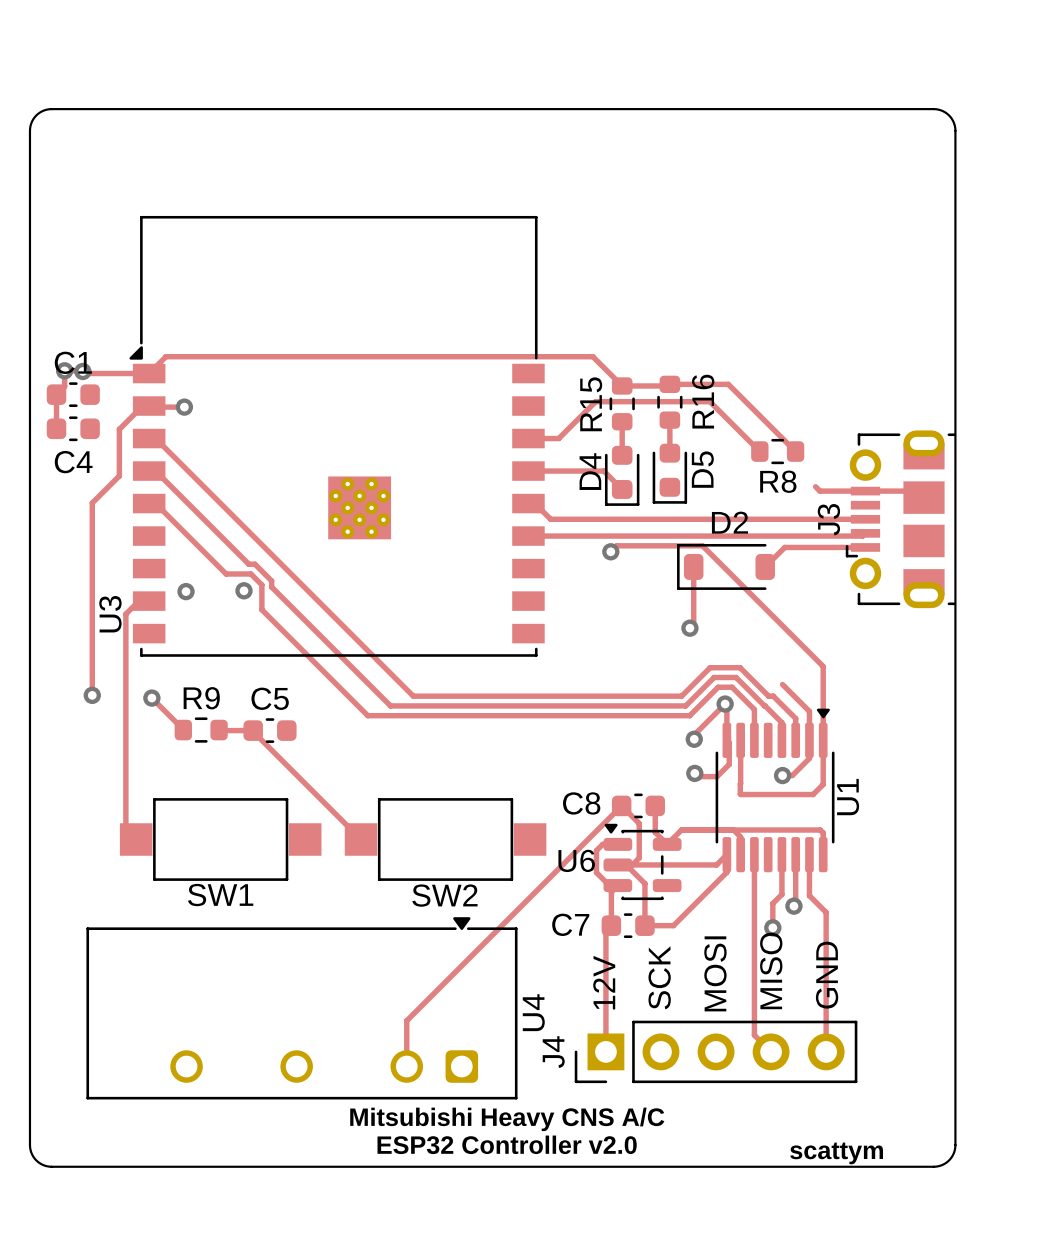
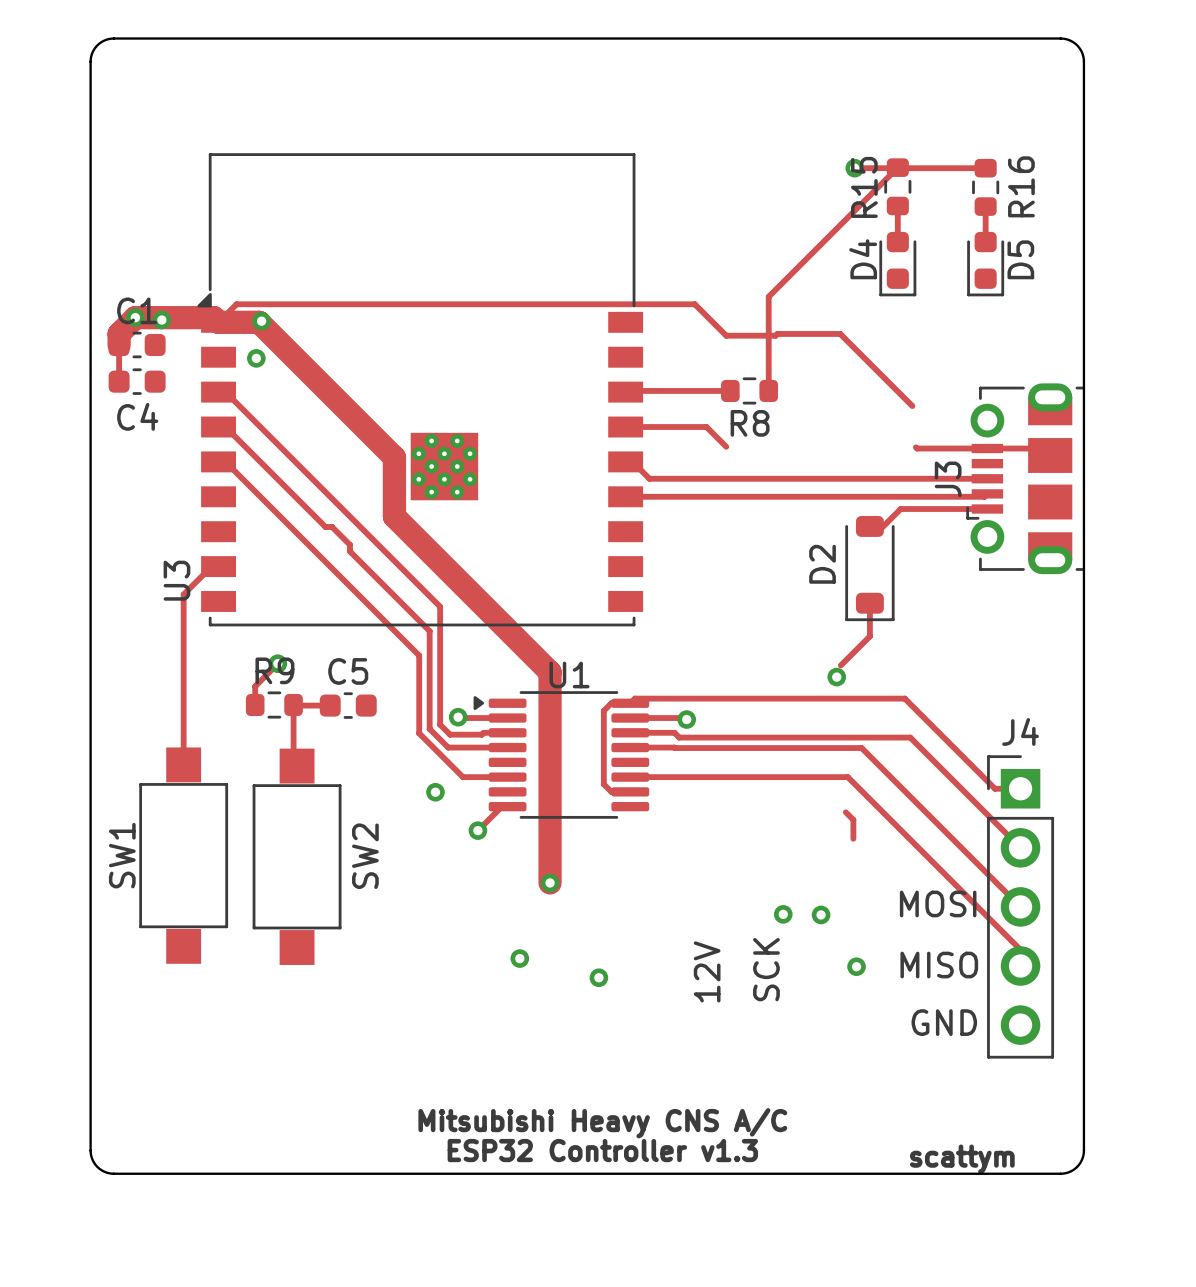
track: none -> (854, 168) (897, 168)
via: none -> (854, 168)
track: none -> (985, 168) (897, 167) (768, 296) (768, 390)
via: none -> (135, 317)
via: (64, 370) -> none
via: (82, 371) -> none
via: none -> (161, 320)
via: none -> (261, 321)
track: (149, 373) (84, 373) (82, 370) (64, 370) (64, 386) (56, 394) -> (550, 882) (550, 672) (394, 516) (394, 457) (259, 322) (218, 322) (213, 317) (135, 317) (119, 333) (119, 345)
R16 position: (669, 402) -> (985, 187)
R15 position: (622, 403) -> (897, 186)
track: (184, 407) (142, 406) (119, 429) (119, 475) (92, 503) (92, 695) -> none
track: (669, 420) (669, 453) -> (985, 206) (985, 242)
track: (622, 421) (622, 455) -> (897, 206) (897, 242)
track: (528, 438) (558, 438) (595, 401) (709, 401) (759, 451) -> (625, 392) (730, 390)
R8 position: (777, 451) -> (749, 390)
D5 position: (669, 473) -> (985, 264)
D4 position: (622, 475) -> (897, 264)
track: (815, 486) (819, 491) -> (915, 447) (938, 448)
track: (610, 551) (616, 545) (702, 545) (823, 666) (823, 784) (813, 794) (740, 794) (740, 740) -> none
via: (610, 551) -> none
track: (693, 566) (693, 624) (689, 628) -> none
D2 rotation: 0° (726, 566) -> 90° counterclockwise (869, 568)
track: (226, 574) (250, 574) (261, 584) (261, 609) -> (301, 537) (339, 575)
via: (243, 590) -> none
via: (186, 591) -> none
track: (142, 601) (138, 601) (125, 614) (125, 829) (136, 839) -> (211, 566) (183, 594) (183, 764)
via: (689, 628) -> none
track: none -> (869, 603) (869, 636) (840, 665)
track: (355, 638) (413, 696) (681, 696) (710, 667) (740, 667) (768, 696) (773, 696) (795, 718) (795, 740) -> (440, 606) (440, 724) (450, 734) (507, 732)
track: (345, 661) (390, 705) (685, 705) (714, 677) (736, 677) (781, 722) (781, 740) -> (429, 631) (429, 729) (448, 747) (507, 747)
track: (336, 683) (367, 715) (689, 715) (718, 687) (732, 687) (754, 709) (754, 740) -> (419, 655) (419, 733) (462, 777) (507, 777)
track: (782, 684) (809, 711) (809, 758) (792, 775) (782, 775) (785, 778) -> none
via: none -> (277, 663)
via: (92, 695) -> none
track: (151, 698) (183, 729) -> (277, 663) (255, 686) (255, 704)
via: (151, 698) -> none
track: none -> (293, 705) (293, 762) (297, 766)
track: (253, 730) (361, 839) -> none
track: (693, 738) (694, 734) (725, 704) (726, 705) (729, 764) (717, 776) (698, 776) (694, 773) -> none
via: (694, 739) -> none
track: none -> (458, 717) (507, 718)
via: none -> (458, 717)
track: none -> (630, 718) (686, 719)
via: none -> (686, 719)
track: none -> (630, 732) (674, 732) (679, 737) (910, 737) (1020, 847)
track: none -> (630, 747) (861, 748) (1020, 906)
via: (694, 773) -> none
via: (782, 775) -> none
U1 rotation: 0° (775, 790) -> 90° counterclockwise (561, 754)
U1 position: (775, 790) -> (561, 754)
track: none -> (630, 777) (847, 777) (1020, 949) (1020, 966)
C8: (638, 805) -> none
track: (655, 805) (655, 832) (667, 844) (681, 830) (820, 830) (823, 832) (823, 854) -> none
track: none -> (1020, 788) (994, 788) (904, 698) (634, 698) (630, 703) (611, 703) (603, 710) (603, 784) (611, 791) (630, 791)
via: none -> (435, 792)
track: none -> (507, 806) (501, 806) (477, 830)
SW1 rotation: 0° (220, 839) -> 90° clockwise (183, 855)
SW2 rotation: 0° (445, 839) -> 90° clockwise (297, 856)
SW2 position: (445, 839) -> (297, 856)
track: (617, 844) (602, 844) (596, 850) (596, 872) (609, 885) (617, 885) (611, 892) (611, 925) (605, 931) (605, 1051) -> none
via: none -> (477, 830)
track: (754, 854) (754, 1035) (771, 1051) -> none
track: (781, 854) (781, 894) (772, 903) (772, 927) -> none
track: (795, 854) (795, 904) (793, 906) -> none
track: (809, 854) (809, 895) (826, 912) (826, 1051) -> none
U6: (642, 861) -> none
track: (617, 864) (716, 864) (726, 854) (726, 872) (673, 925) (644, 925) (644, 883) (626, 864) -> none
track: (632, 864) (639, 857) (639, 823) (621, 805) (406, 1020) (406, 1066) -> none
SW2 name position: SW2 (444, 895) -> SW2 (365, 856)
via: none -> (550, 882)
via: (793, 906) -> none
C7: (628, 925) -> none
via: none -> (783, 914)
via: none -> (821, 914)
via: (772, 927) -> none
via: none -> (519, 958)
text rotation: 0° (771, 971) -> 90° clockwise (939, 965)
text rotation: 0° (715, 973) -> 90° clockwise (938, 903)
text position: MOSI (715, 973) -> MOSI (938, 903)
via: none -> (856, 966)
text rotation: 0° (827, 975) -> 90° clockwise (944, 1022)
via: none -> (598, 977)
U4: (301, 1008) -> none
J4 rotation: 0° (716, 1051) -> 90° clockwise (1020, 906)
J4 position: (716, 1051) -> (1020, 906)
text: ESP32 Controller v2.0 (507, 1144) -> ESP32 Controller v1.3 (602, 1150)

